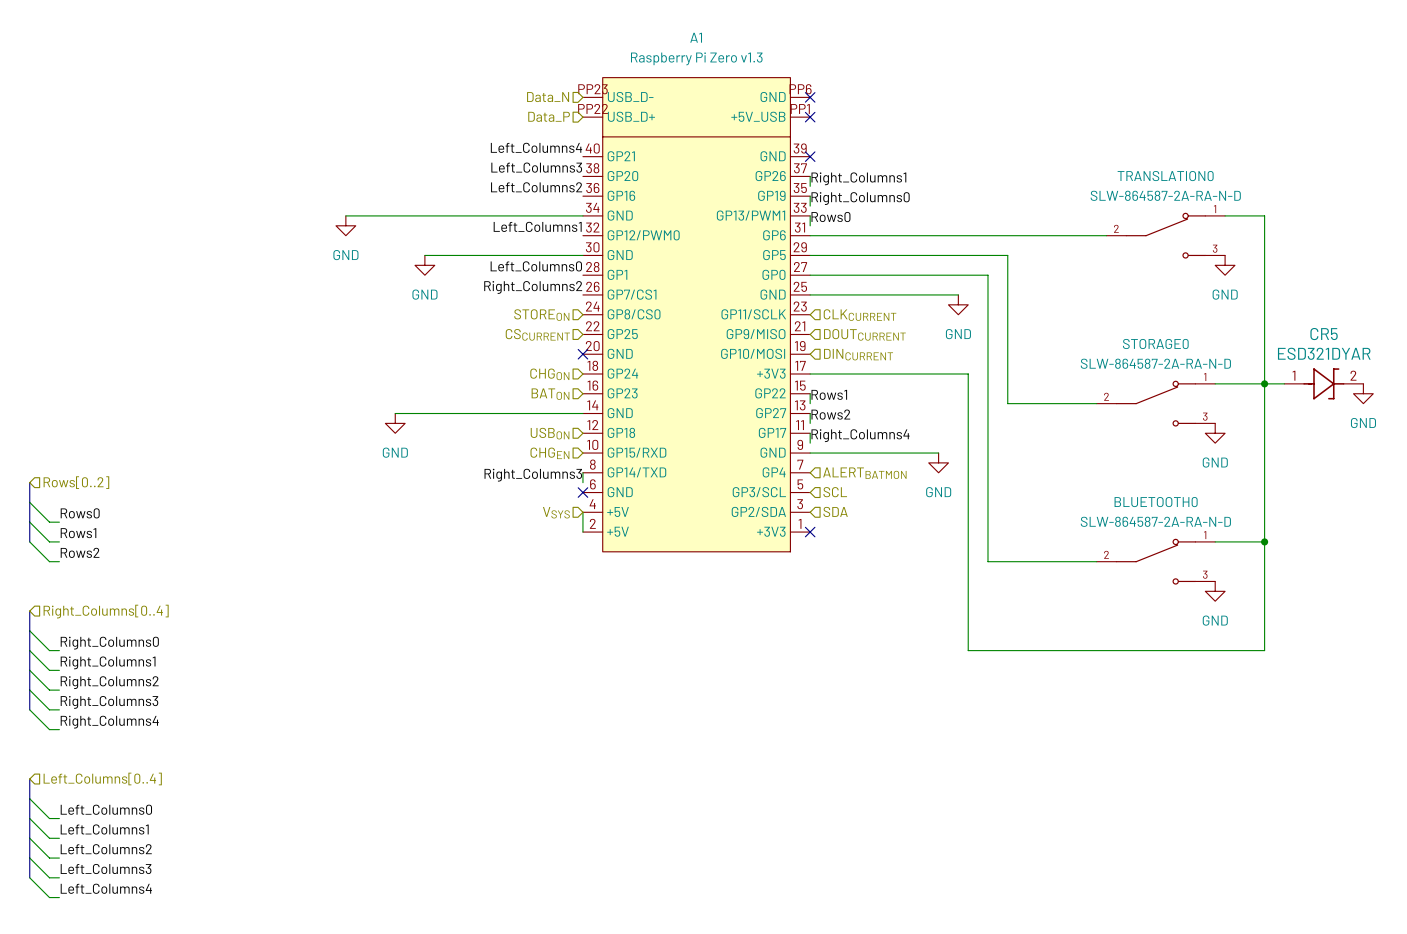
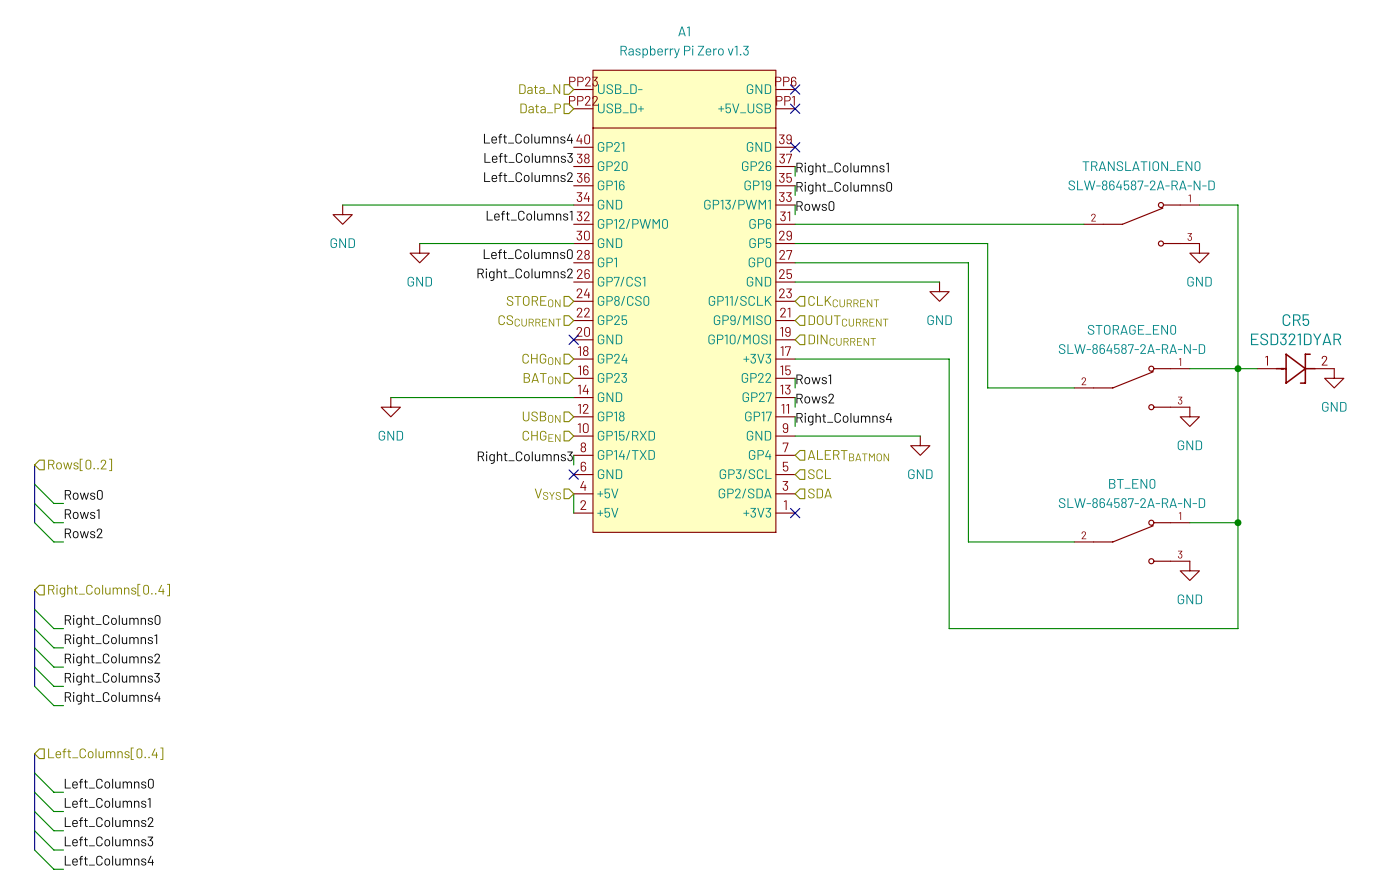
TRANSLATION0 name: TRANSLATION0 (1165, 176) -> TRANSLATION_EN0 (1141, 166)
STORAGE0 name: STORAGE0 (1155, 343) -> STORAGE_EN0 (1131, 329)
BLUETOOTH0 name: BLUETOOTH0 (1156, 502) -> BT_EN0 (1132, 483)

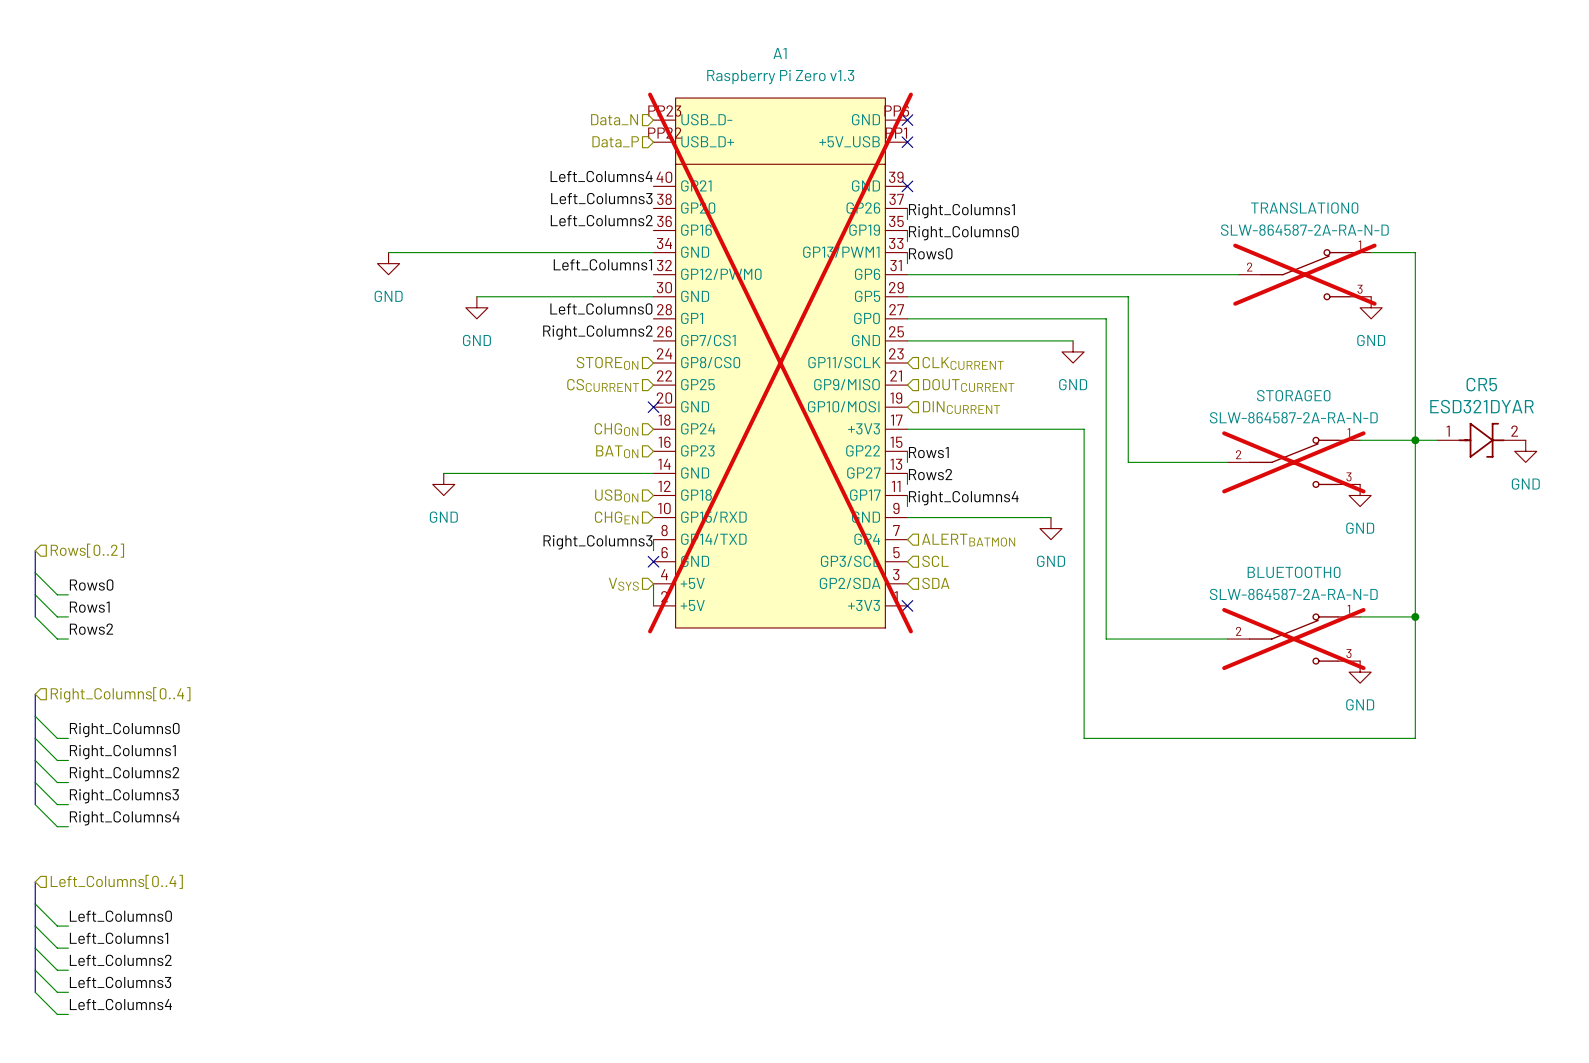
TRANSLATION_EN0 name: TRANSLATION_EN0 (1141, 166) -> TRANSLATION0 (1304, 208)
TRANSLATION_EN0 do-not-place cross: none -> (1304, 274)
A1 do-not-place cross: none -> (780, 363)
STORAGE_EN0 name: STORAGE_EN0 (1131, 329) -> STORAGE0 (1293, 395)
STORAGE_EN0 do-not-place cross: none -> (1293, 462)
BT_EN0 name: BT_EN0 (1132, 483) -> BLUETOOTH0 (1294, 572)
BT_EN0 do-not-place cross: none -> (1293, 639)

